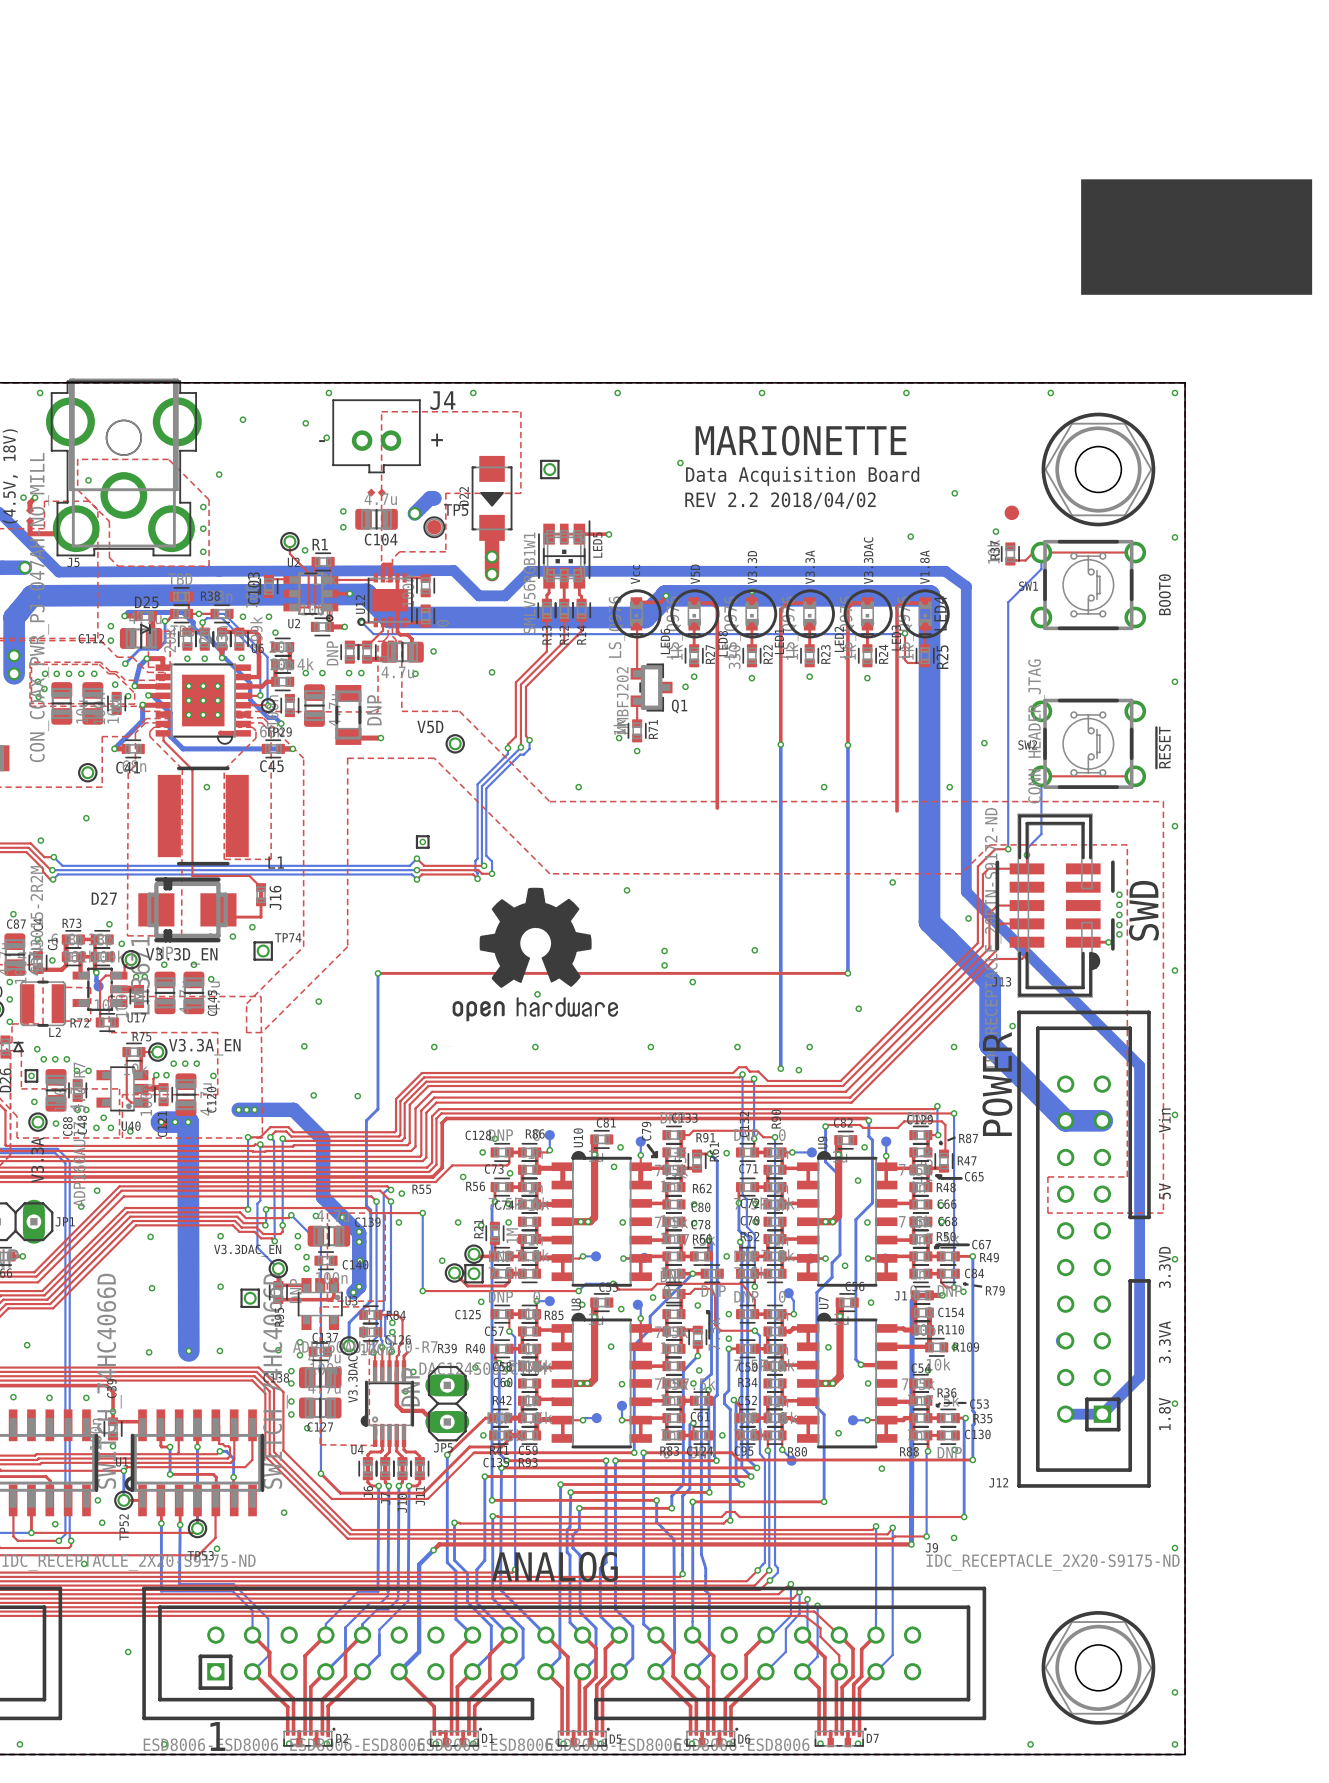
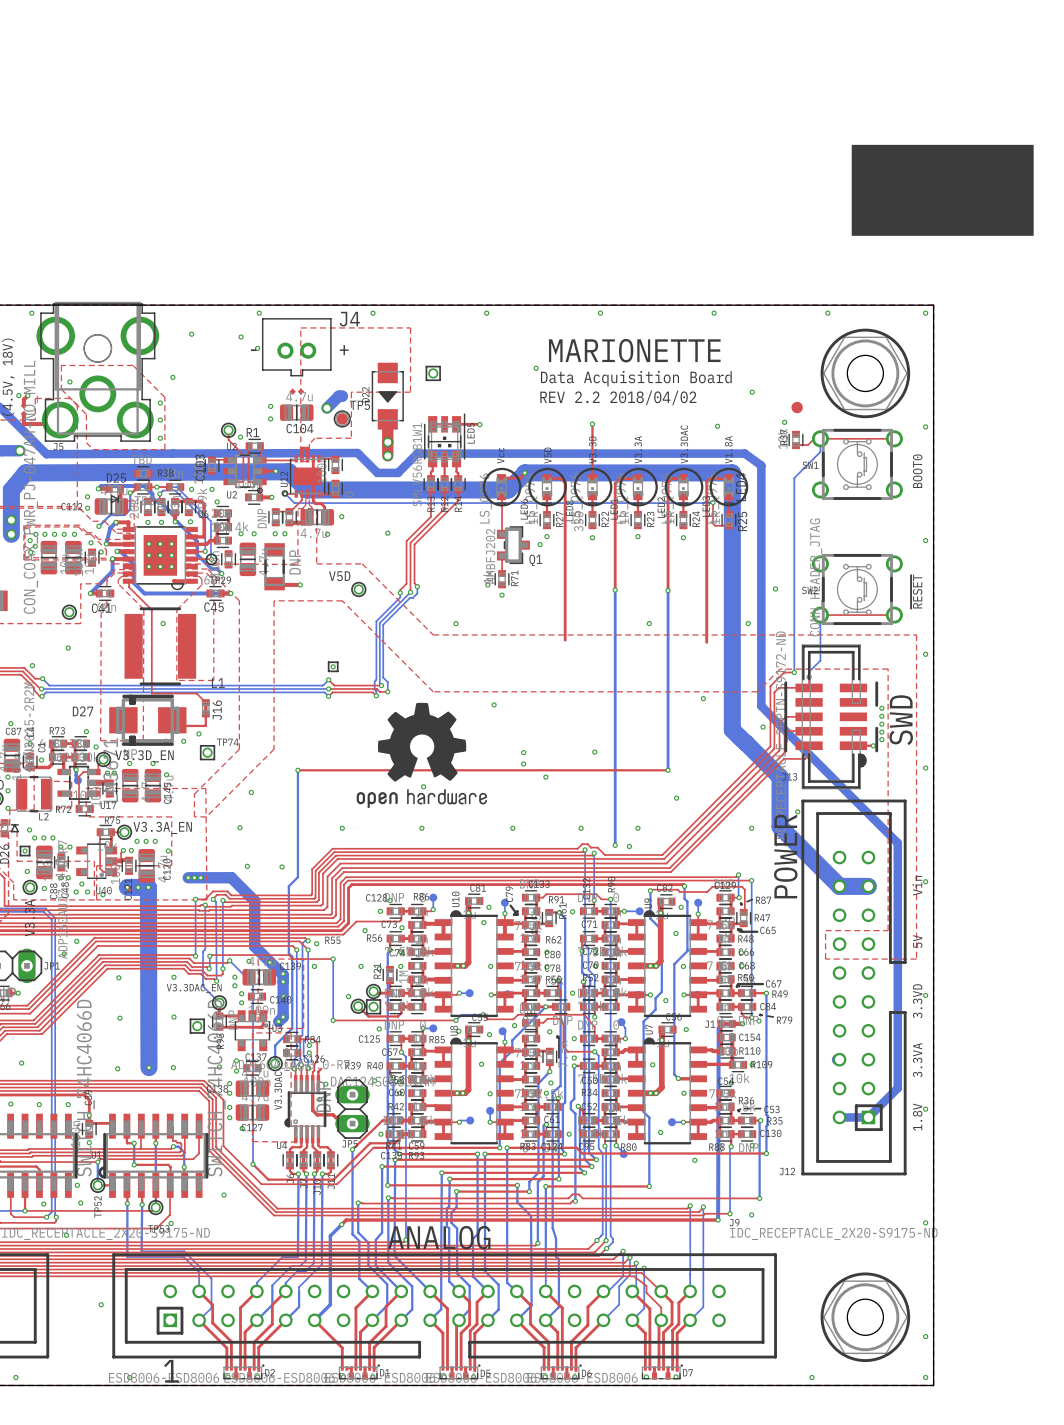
top track: none -> (592, 424) (592, 469)
via position: (751, 591) -> (592, 424)

